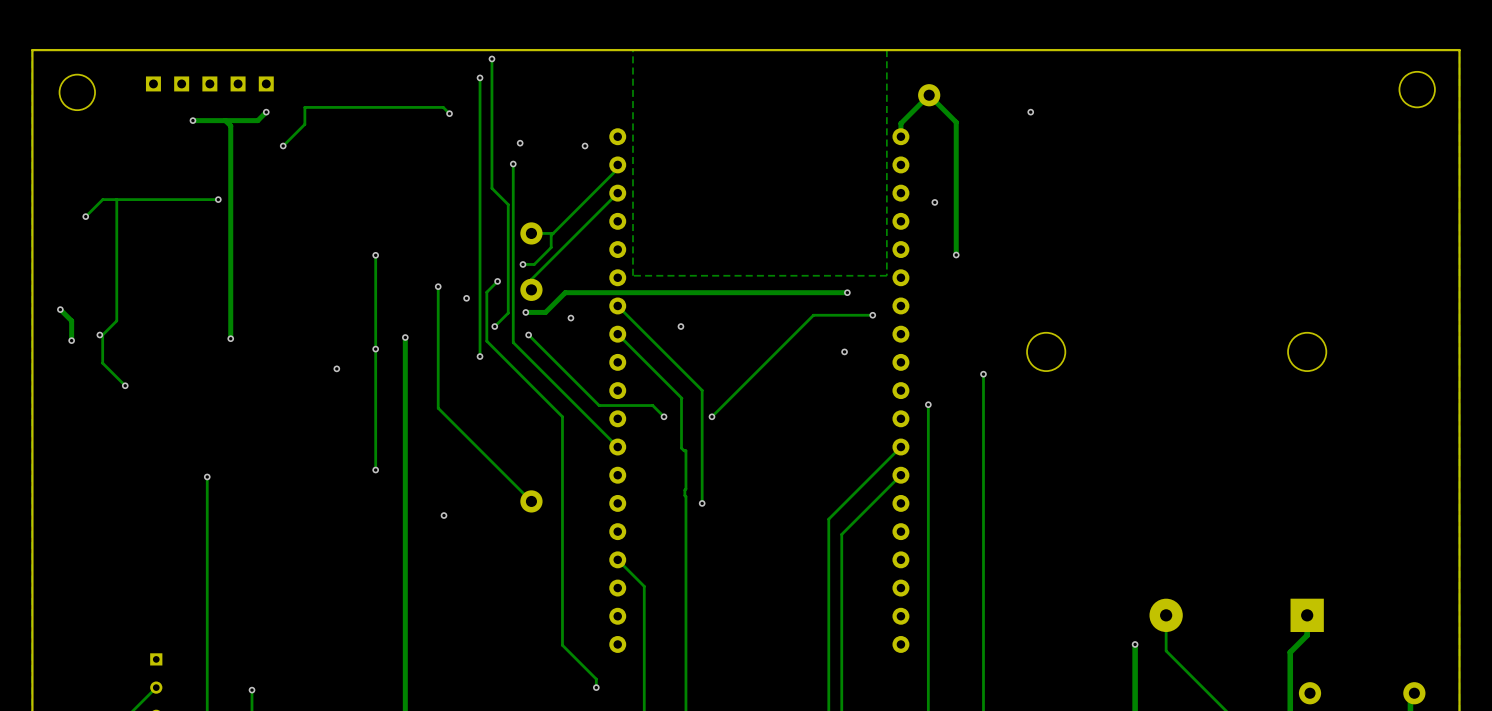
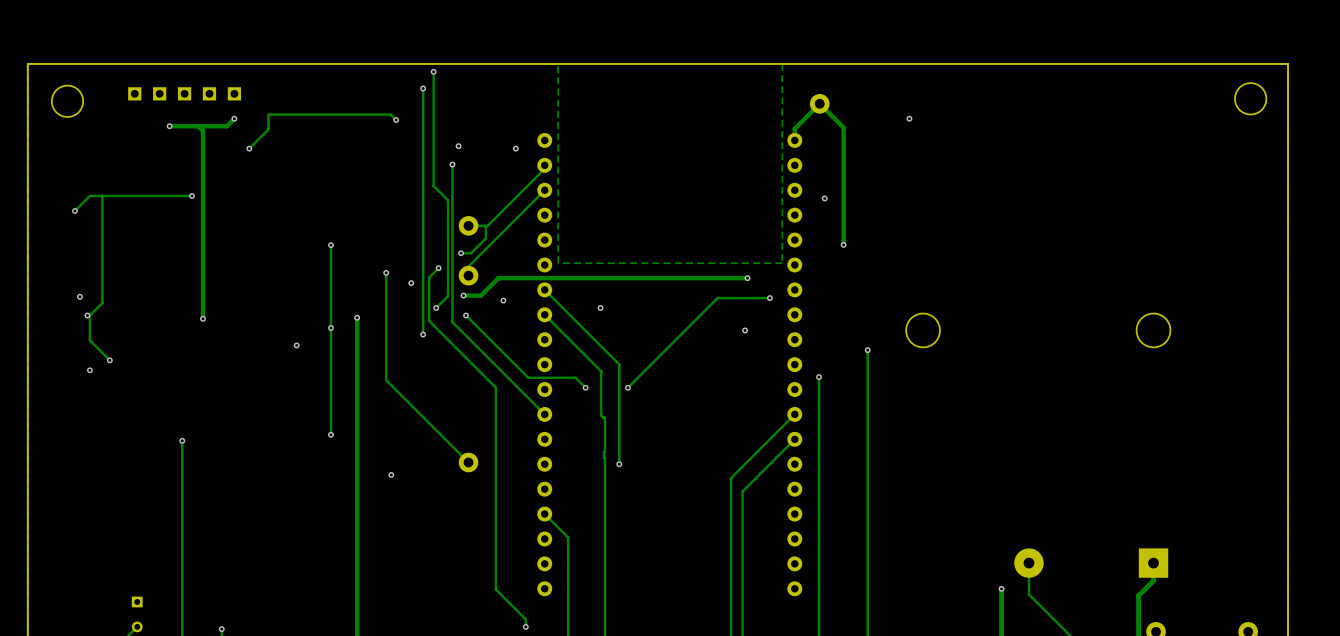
track: (60, 309) (71, 320) (71, 340) -> none
via: (60, 309) -> none
via: none -> (79, 296)
via: (71, 340) -> none
via: none -> (89, 370)

